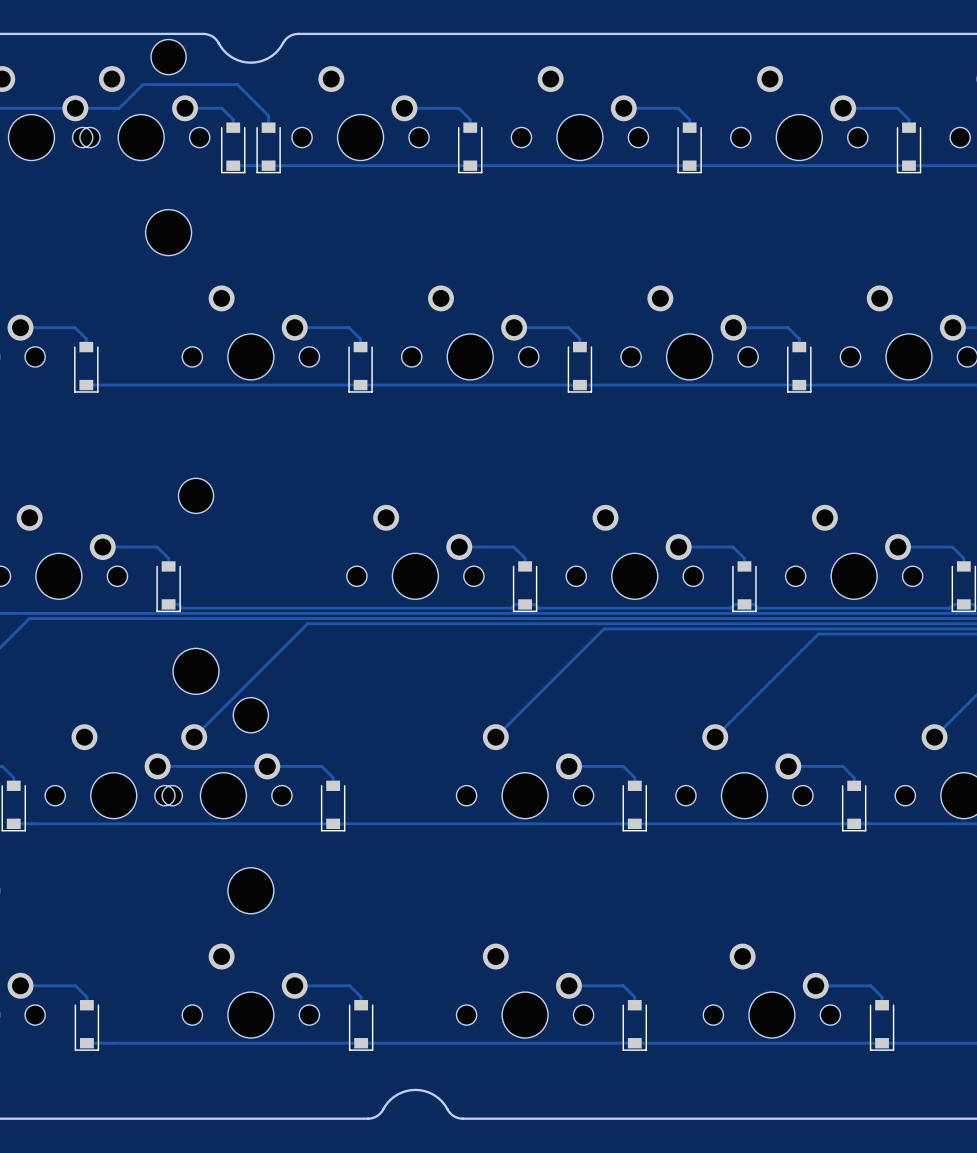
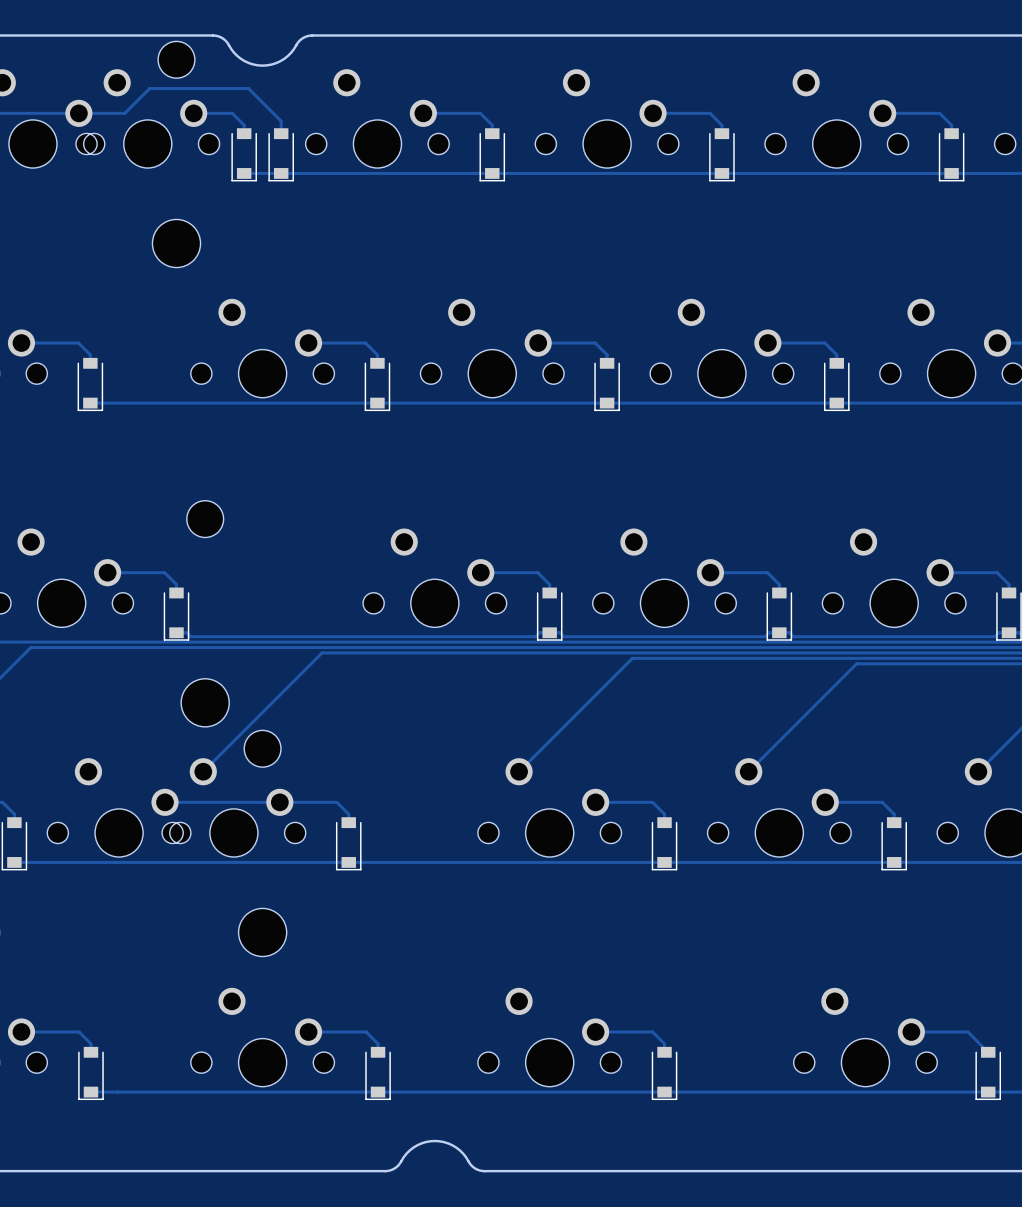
track: (870, 985) (882, 997) (882, 1005) -> (911, 1032) (967, 1032) (988, 1052)
track: (870, 985) (815, 985) -> none
part position: (771, 990) -> (865, 1037)
part position: (882, 1025) -> (988, 1073)

